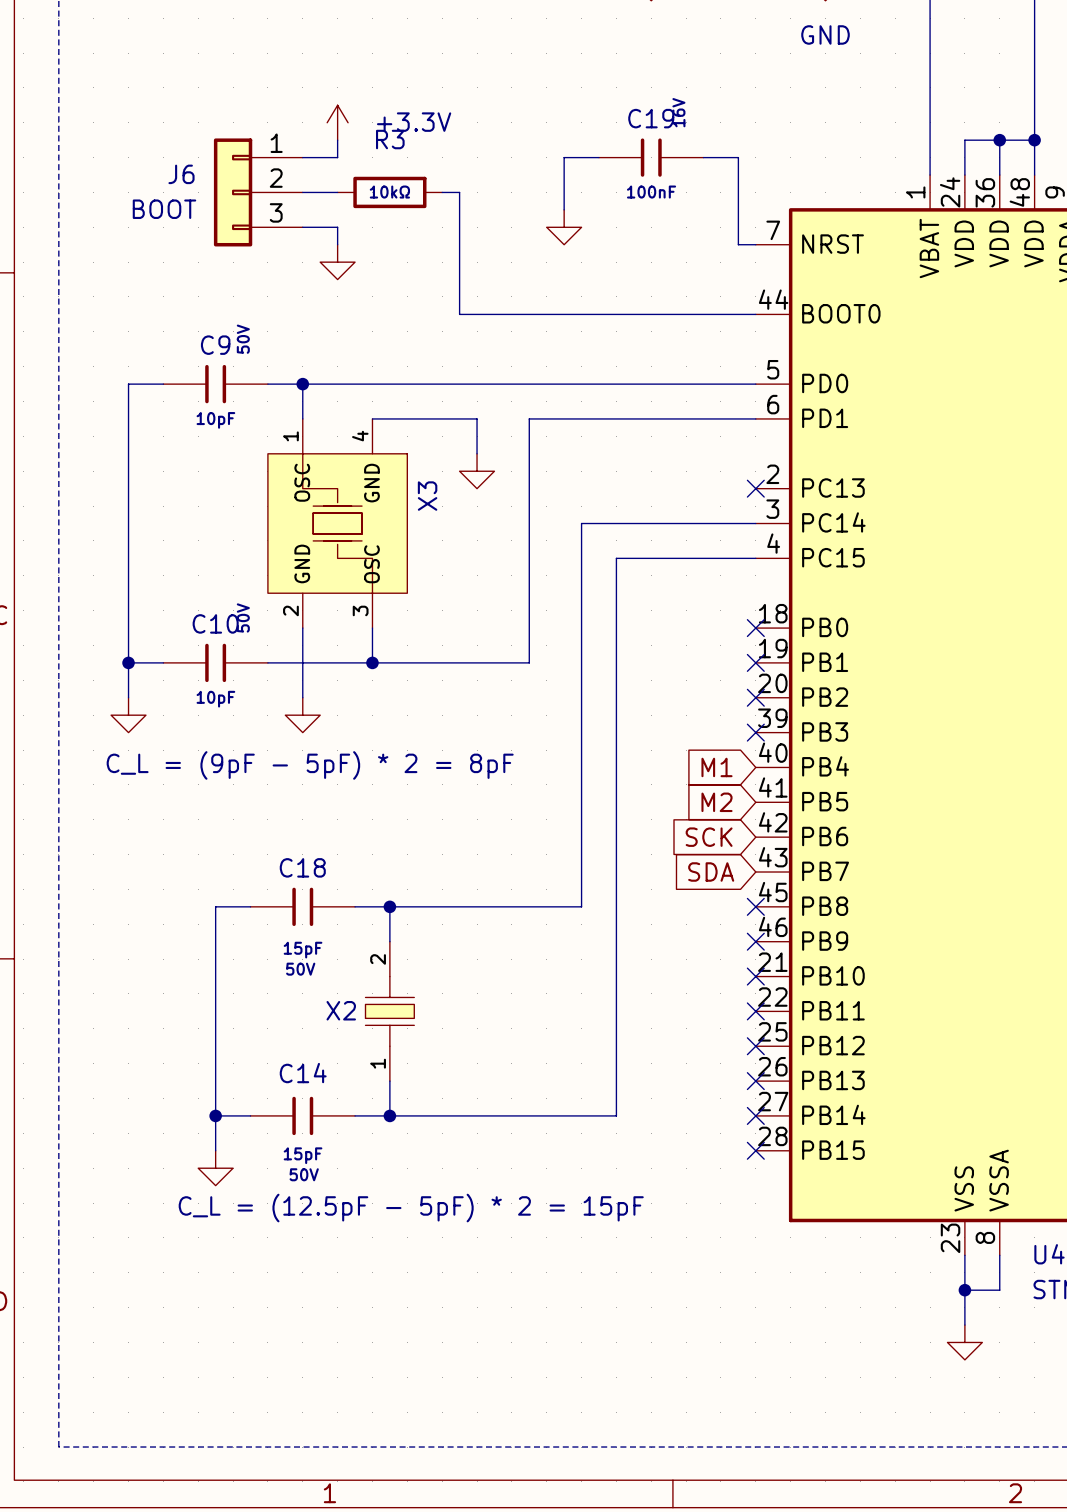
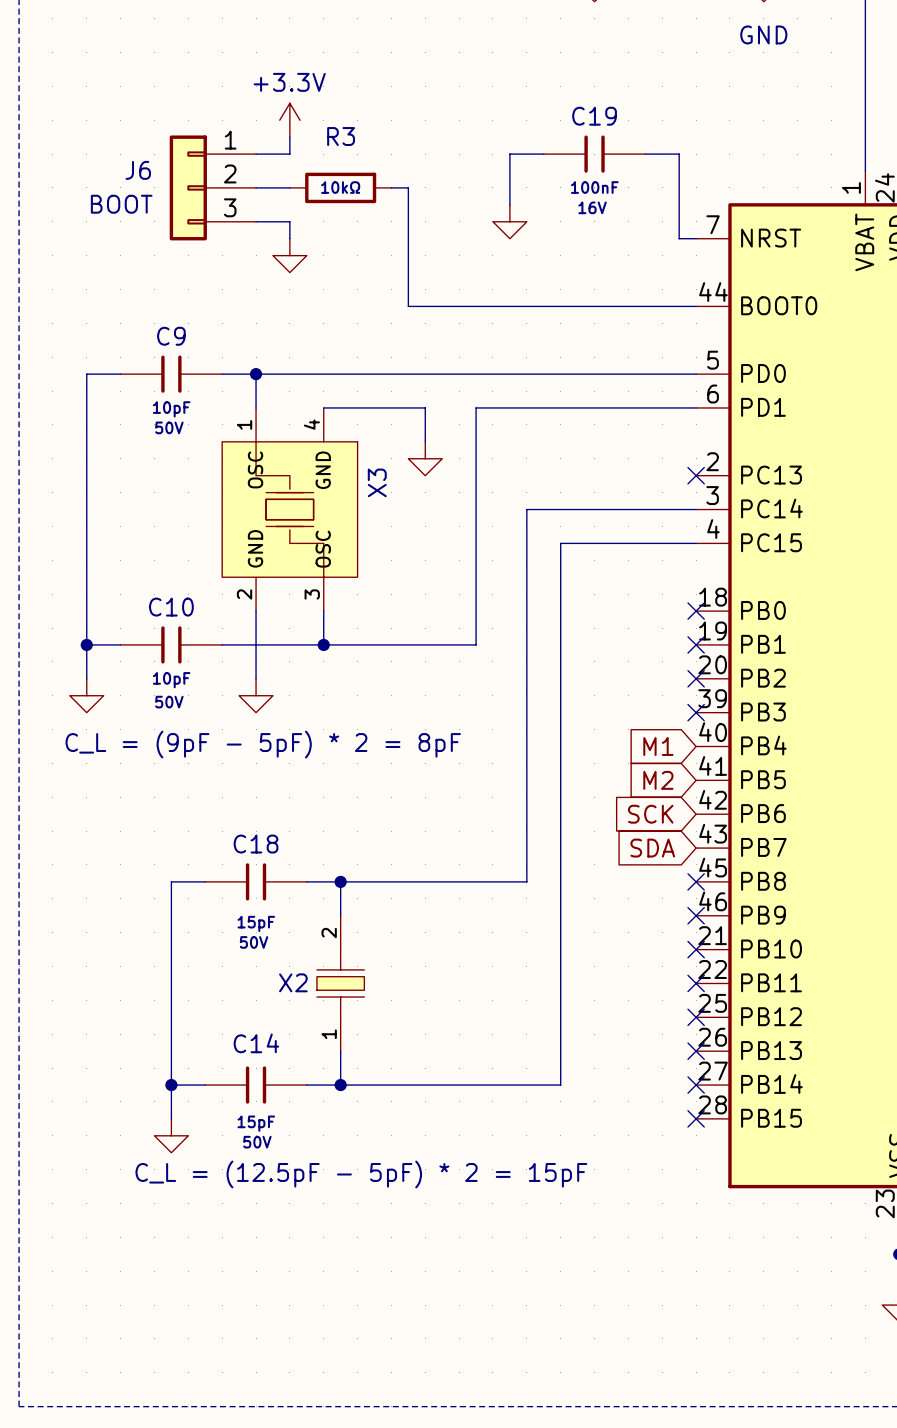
C19 text rotation: 0° (678, 112) -> 90° clockwise (592, 207)
C19 text position: 16V (678, 112) -> 16V (592, 207)
power symbol text position: +3.3V (414, 122) -> +3.3V (289, 82)
C9 text rotation: 0° (243, 339) -> 90° clockwise (169, 427)
C9 text position: 50V (243, 339) -> 50V (169, 427)
C10 text rotation: 0° (243, 617) -> 90° clockwise (169, 702)
C10 text position: 50V (243, 617) -> 50V (169, 702)

